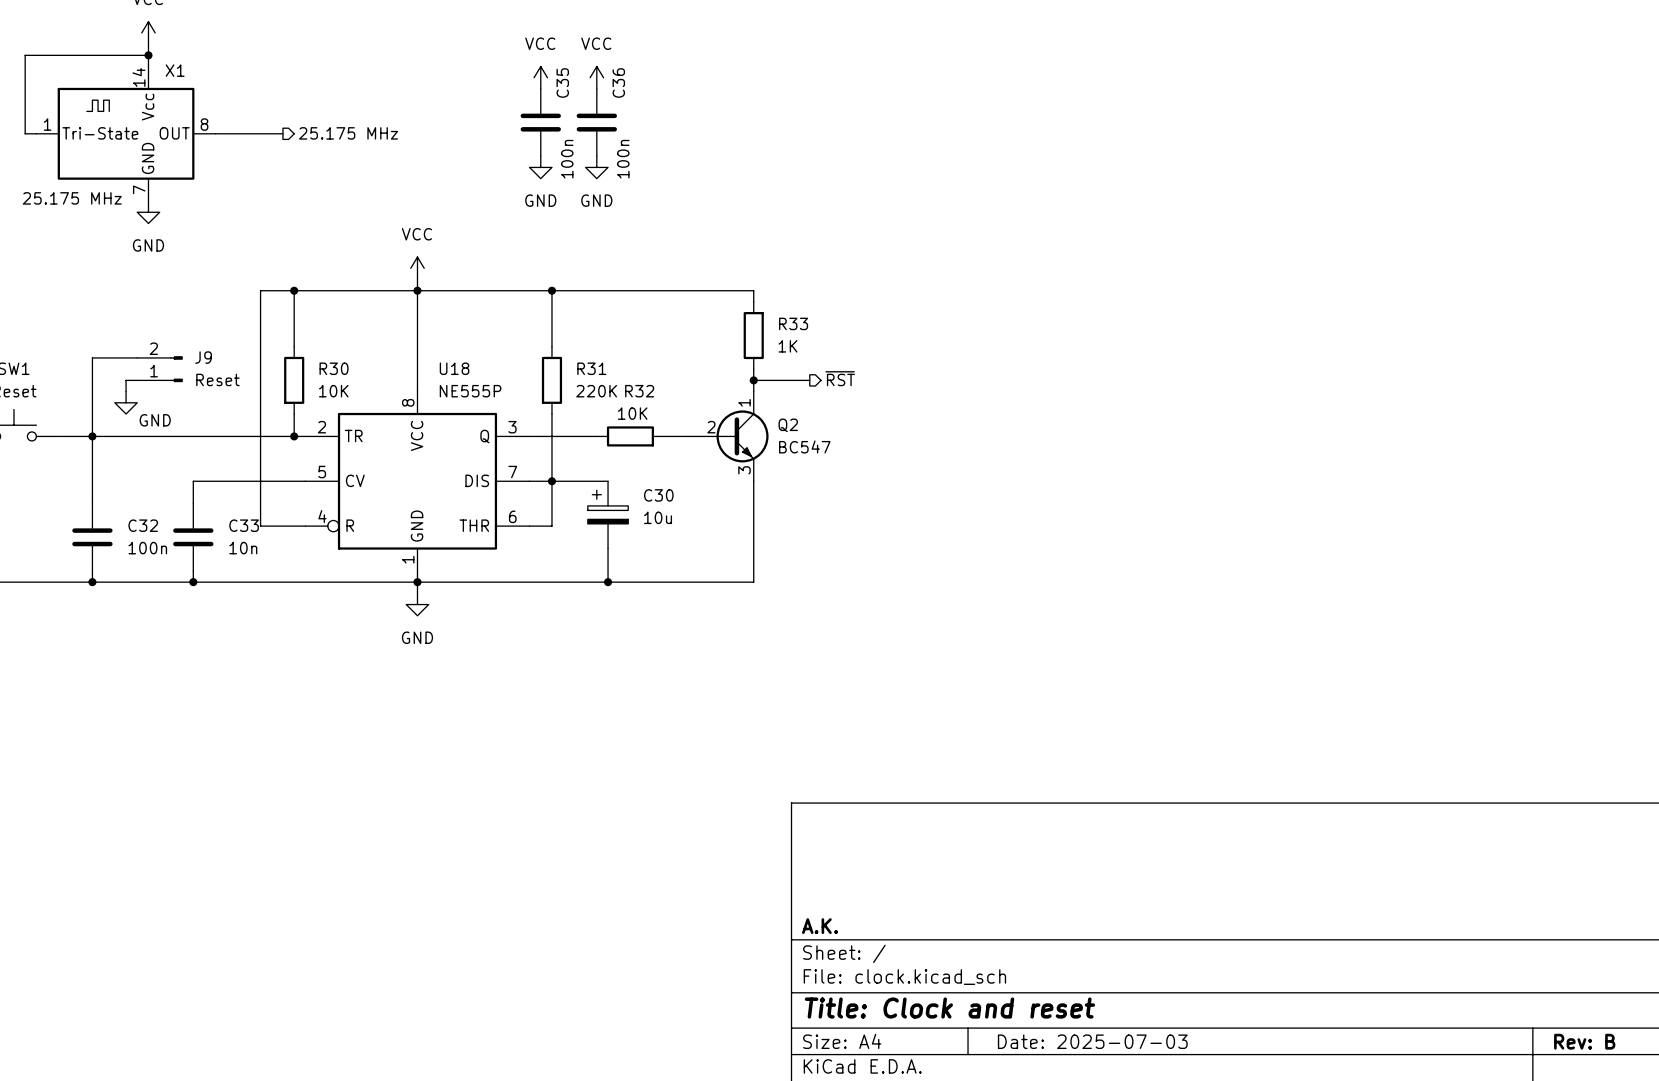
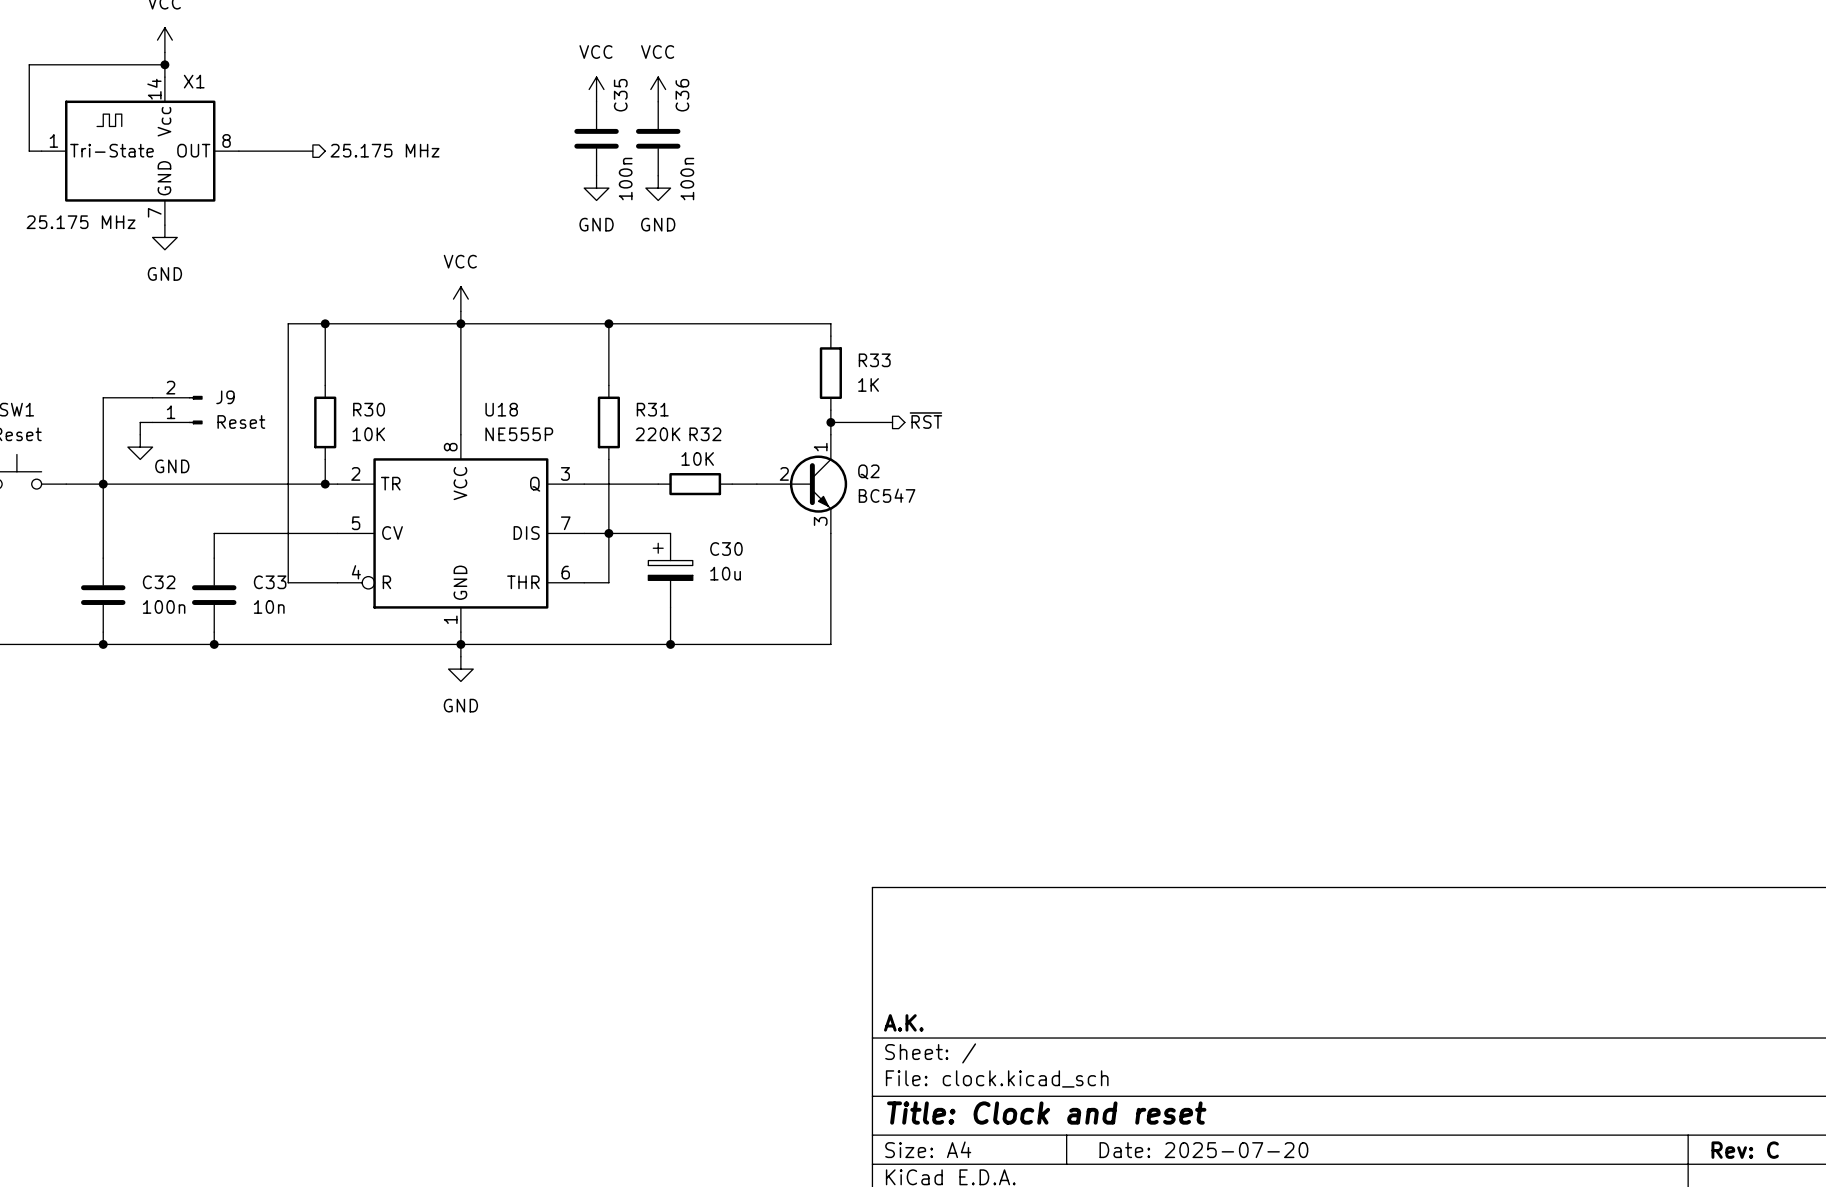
title block: Date: 2025-07-03 (1092, 1041) -> Date: 2025-07-20 (1203, 1150)
title block: Rev: B (1584, 1041) -> Rev: C (1745, 1150)

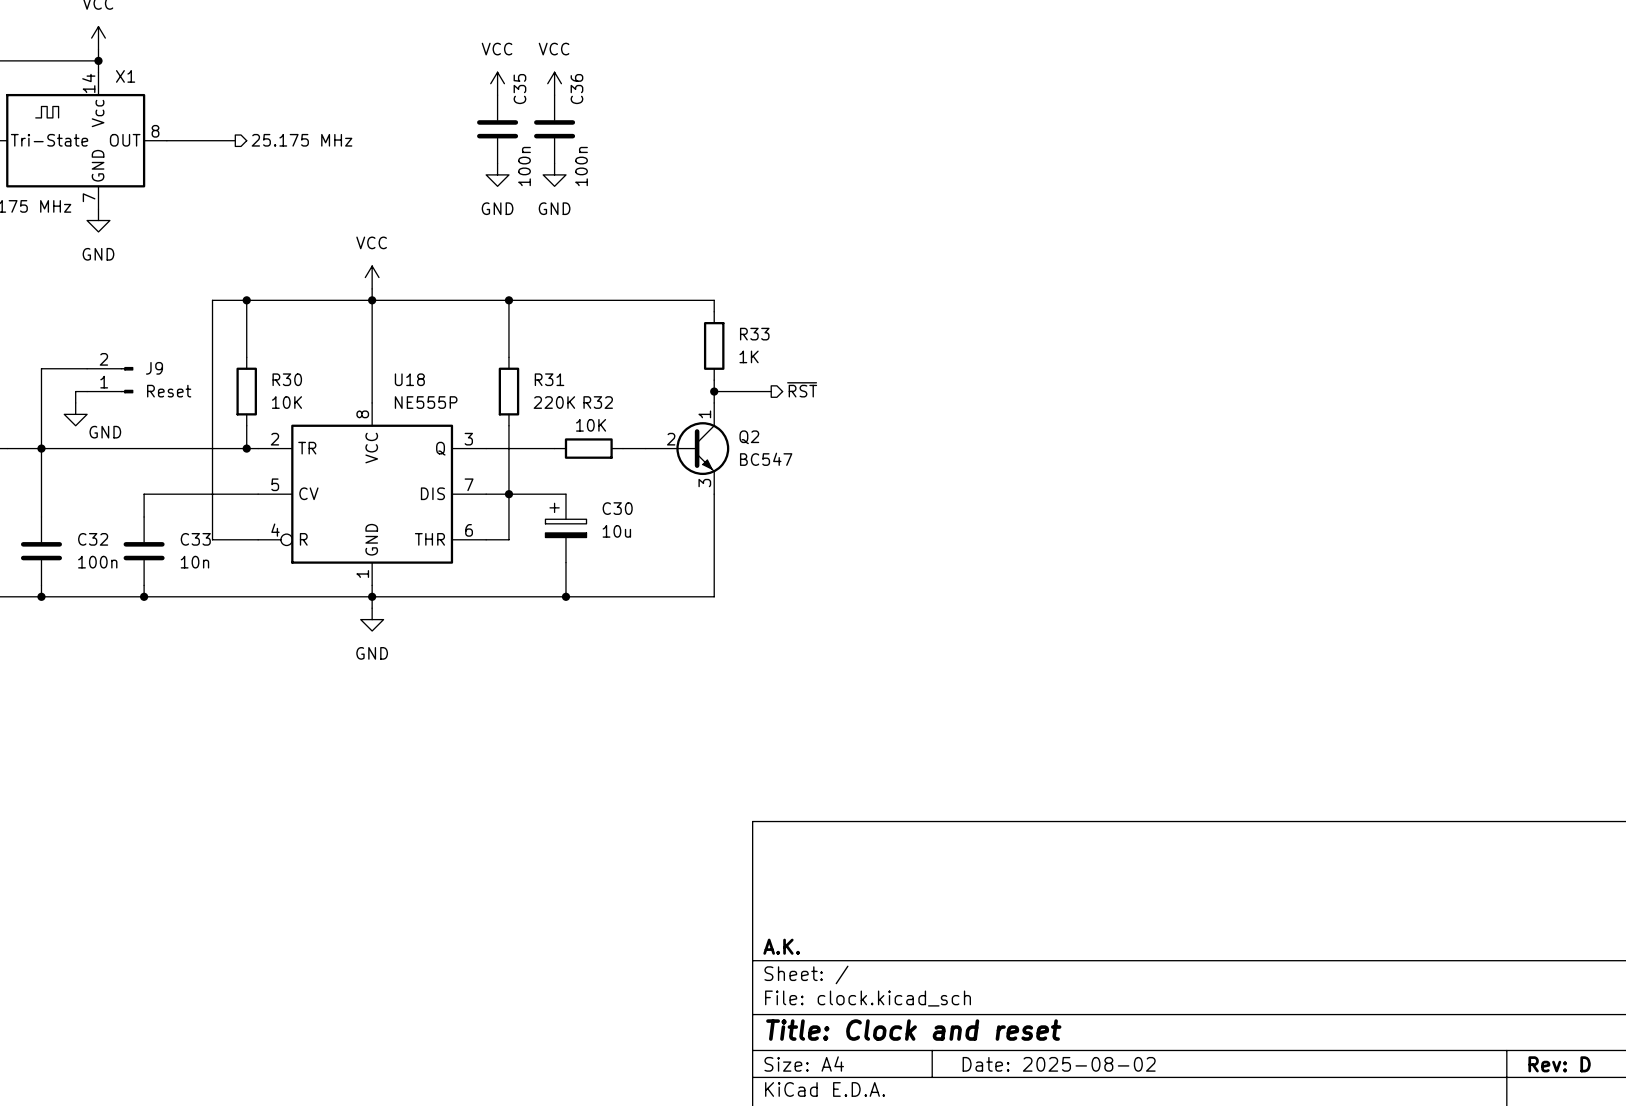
title block: Date: 2025-07-20 (1203, 1150) -> Date: 2025-08-02 (1059, 1064)
title block: Rev: C (1745, 1150) -> Rev: D (1559, 1064)

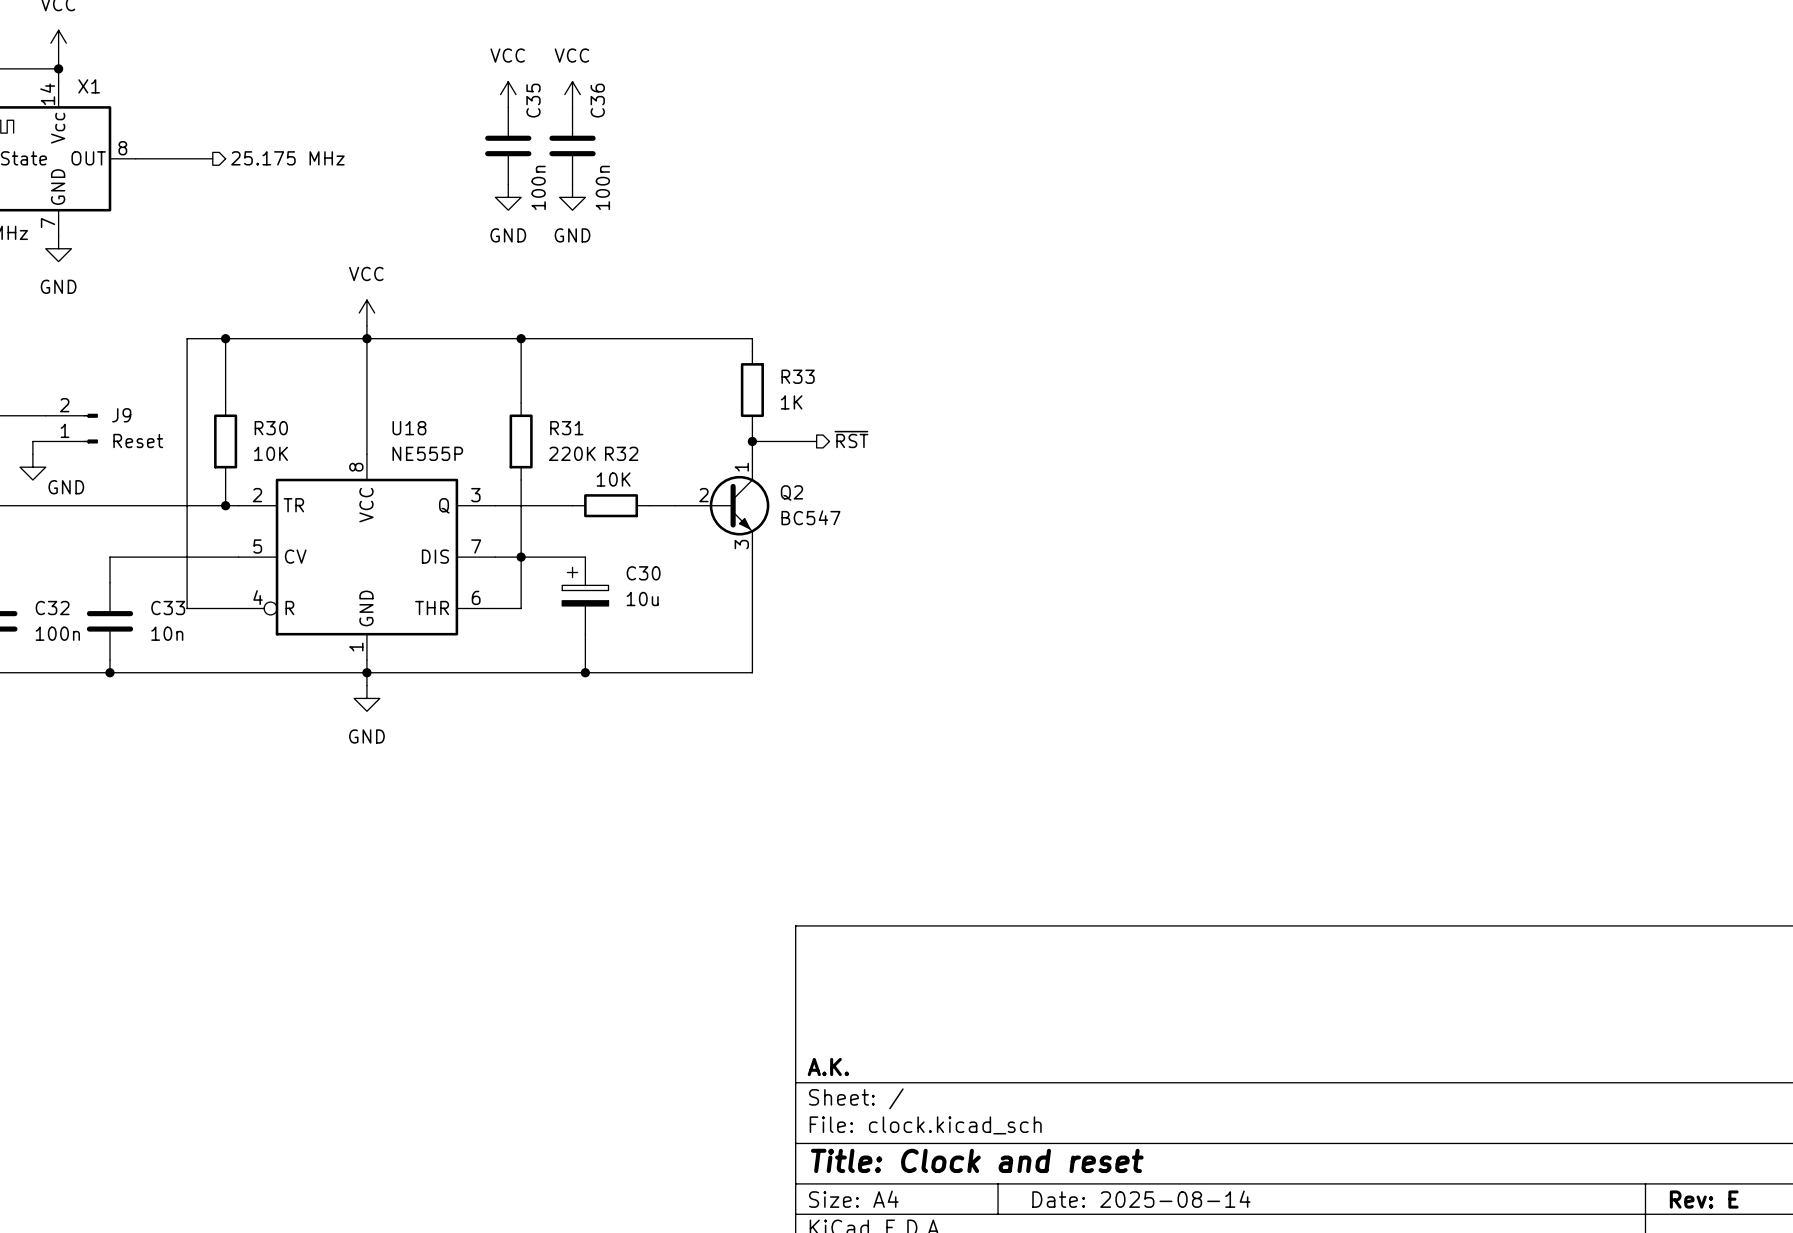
title block: Date: 2025-08-02 (1059, 1064) -> Date: 2025-08-14 (1141, 1199)
title block: Rev: D (1559, 1064) -> Rev: E (1704, 1199)

